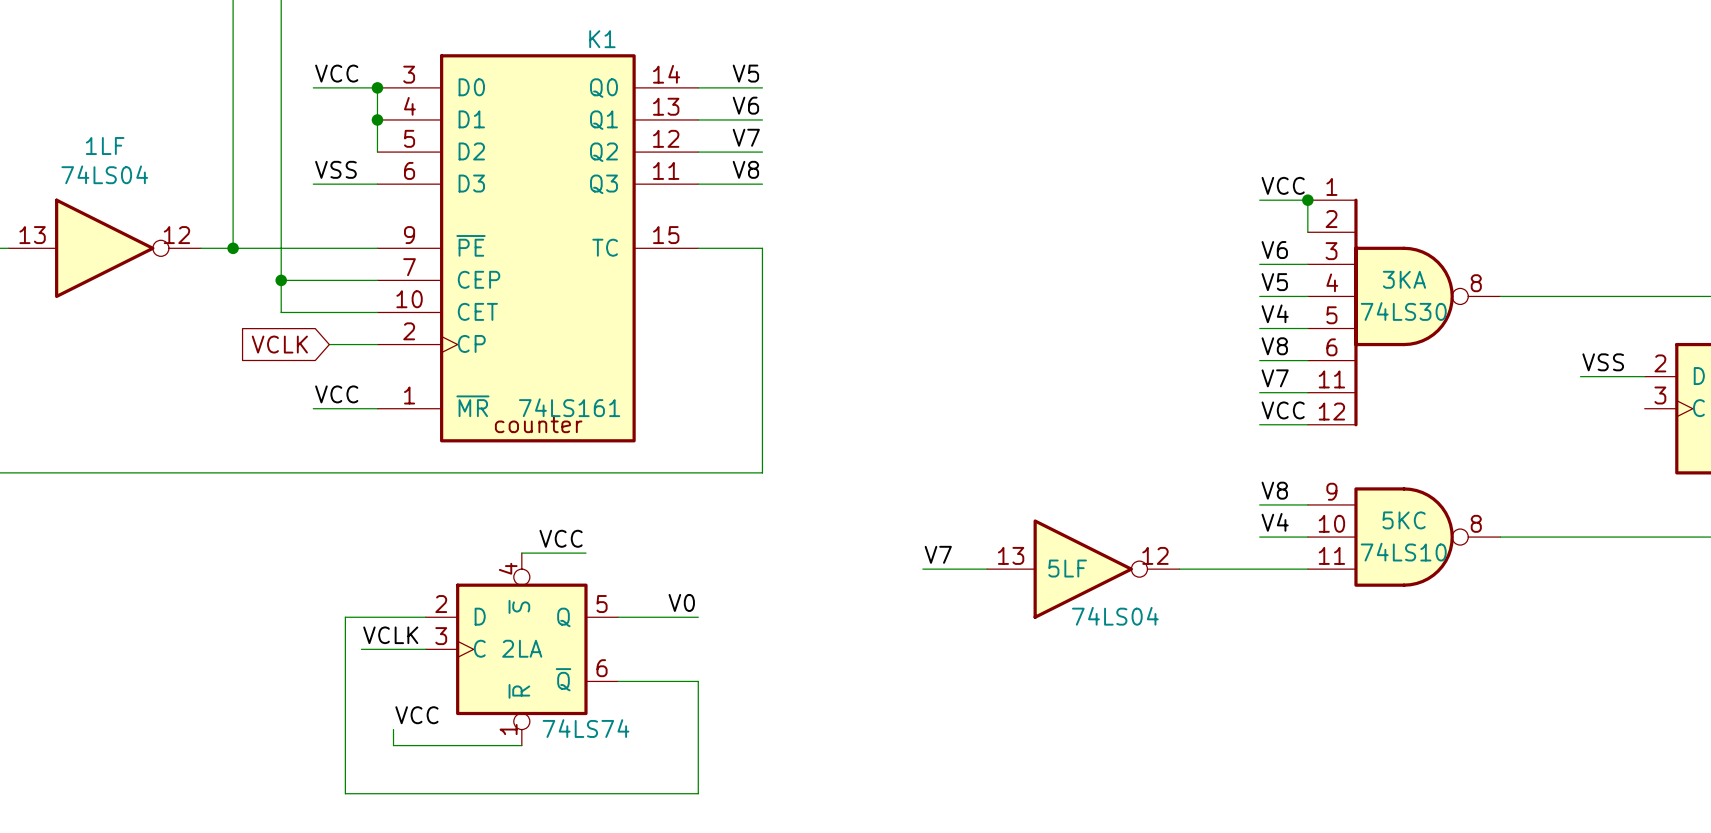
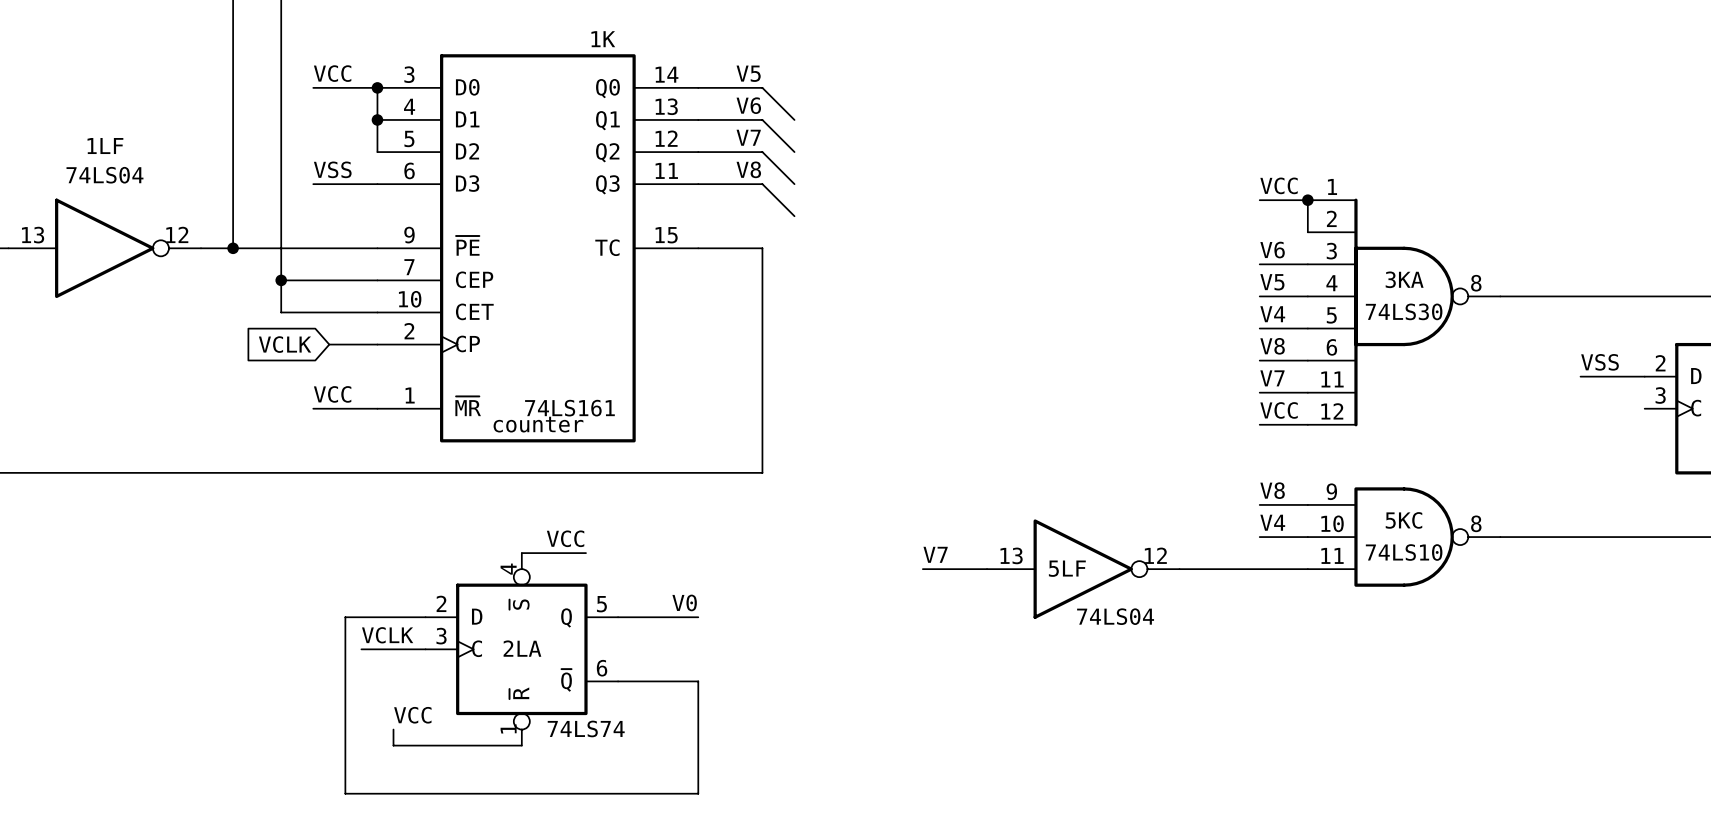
K1 name: K1 (602, 39) -> 1K (603, 39)
wire: none -> (762, 87) (794, 119)
wire: none -> (762, 119) (794, 152)
wire: none -> (762, 152) (794, 184)
wire: none -> (762, 184) (794, 216)

